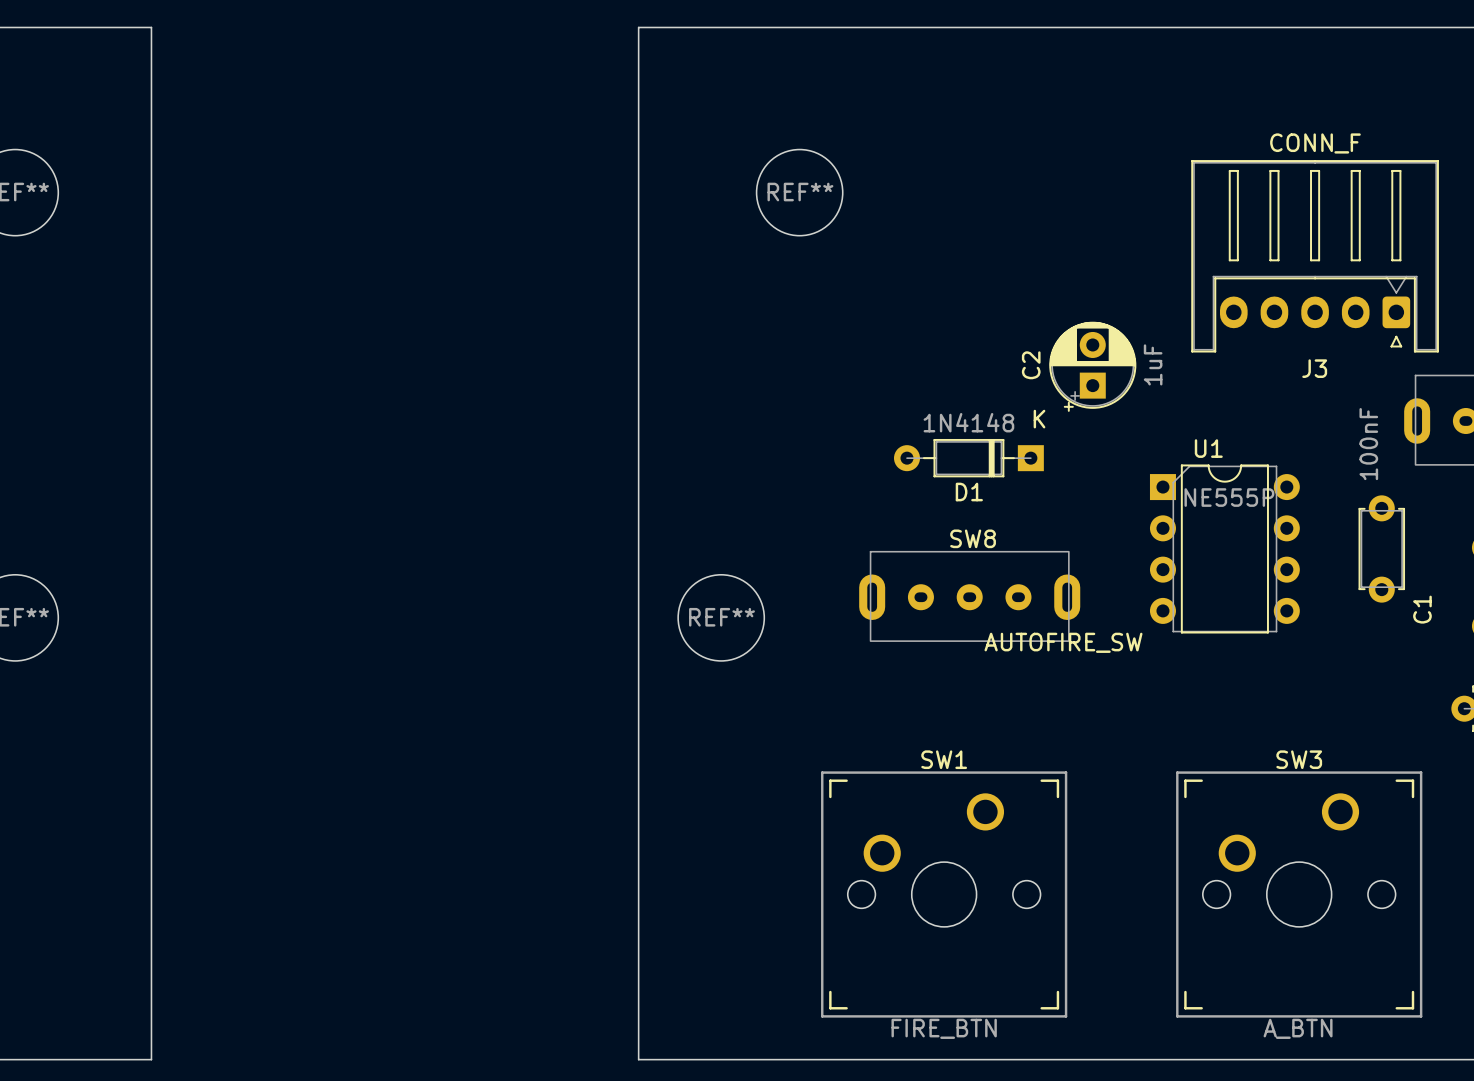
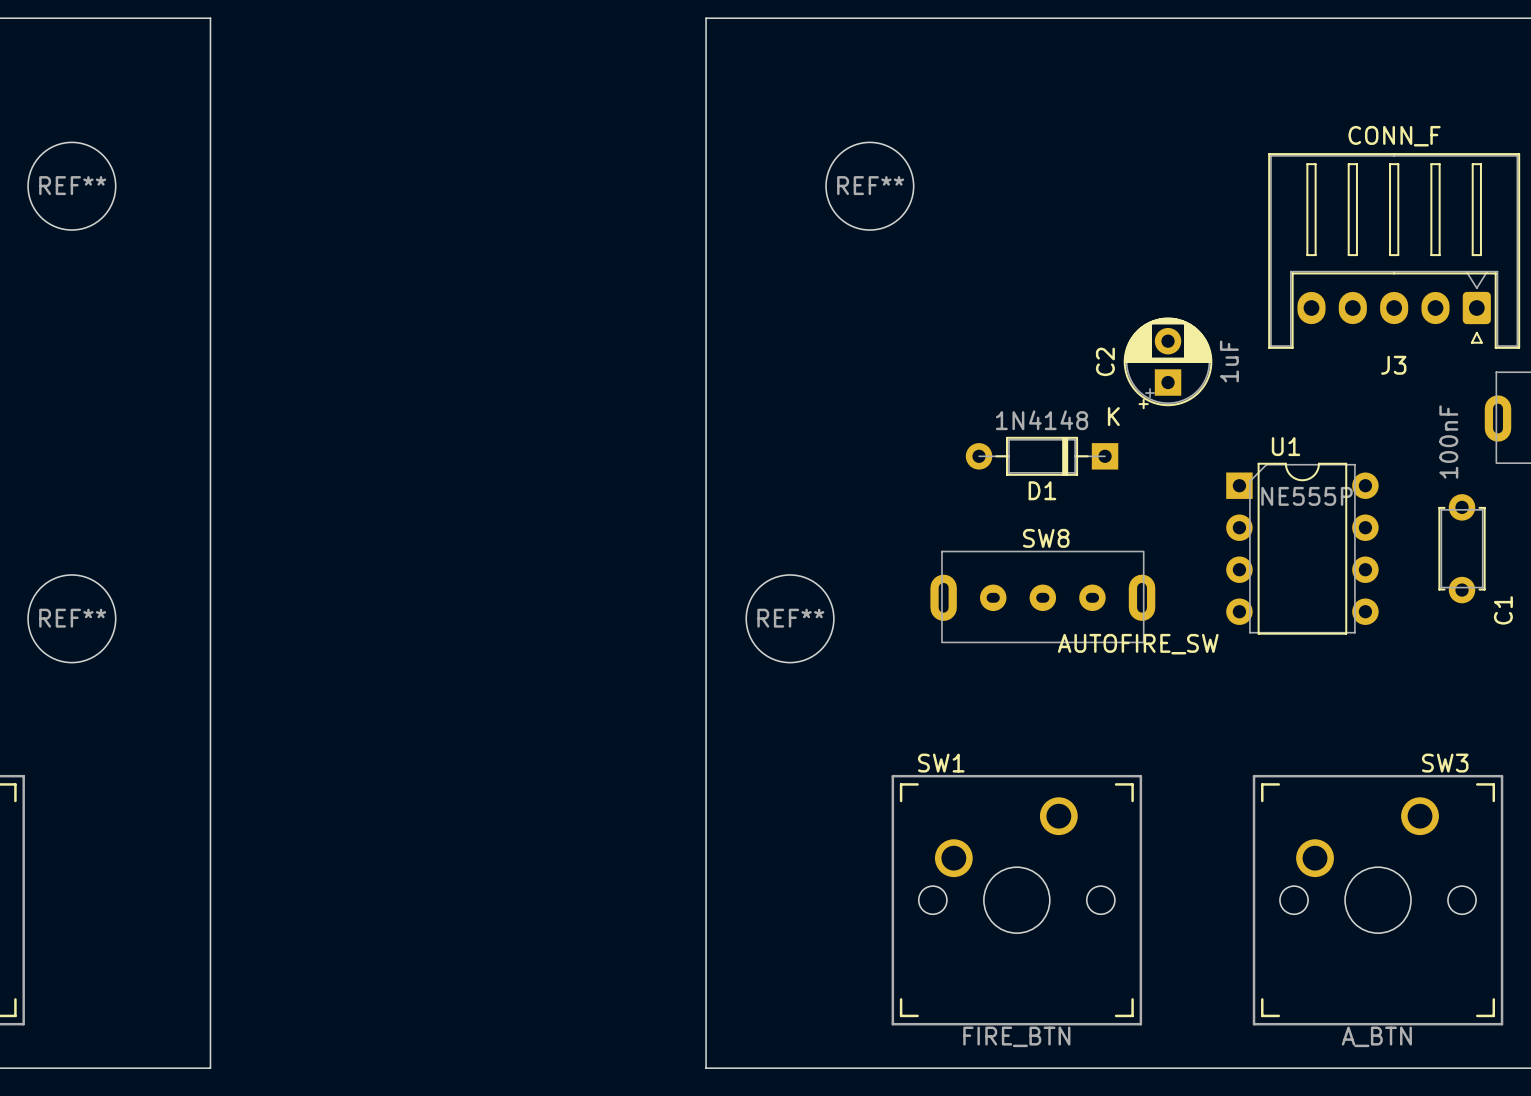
SW1 name position: SW1 (944, 759) -> SW1 (941, 763)
SW3 name position: SW3 (1299, 759) -> SW3 (1445, 763)

